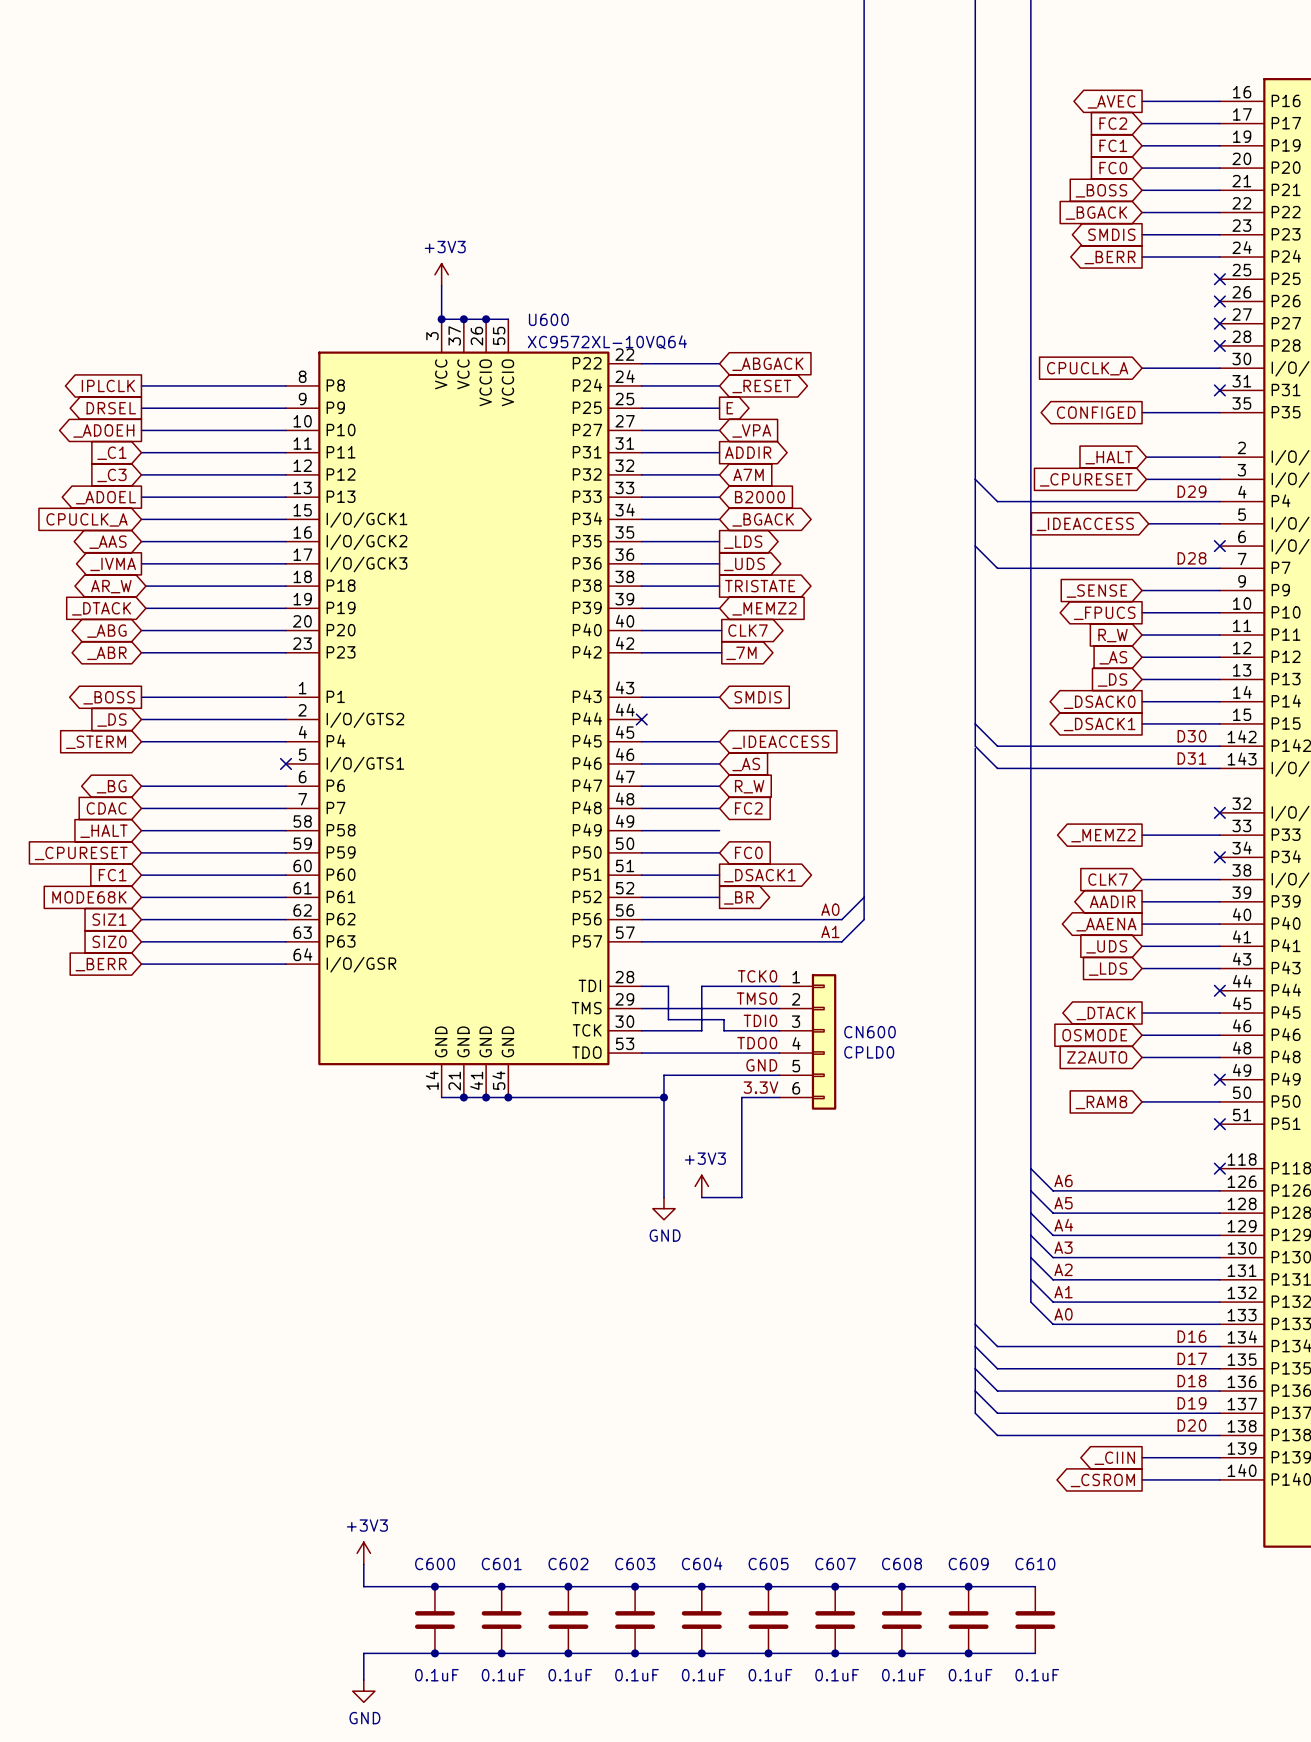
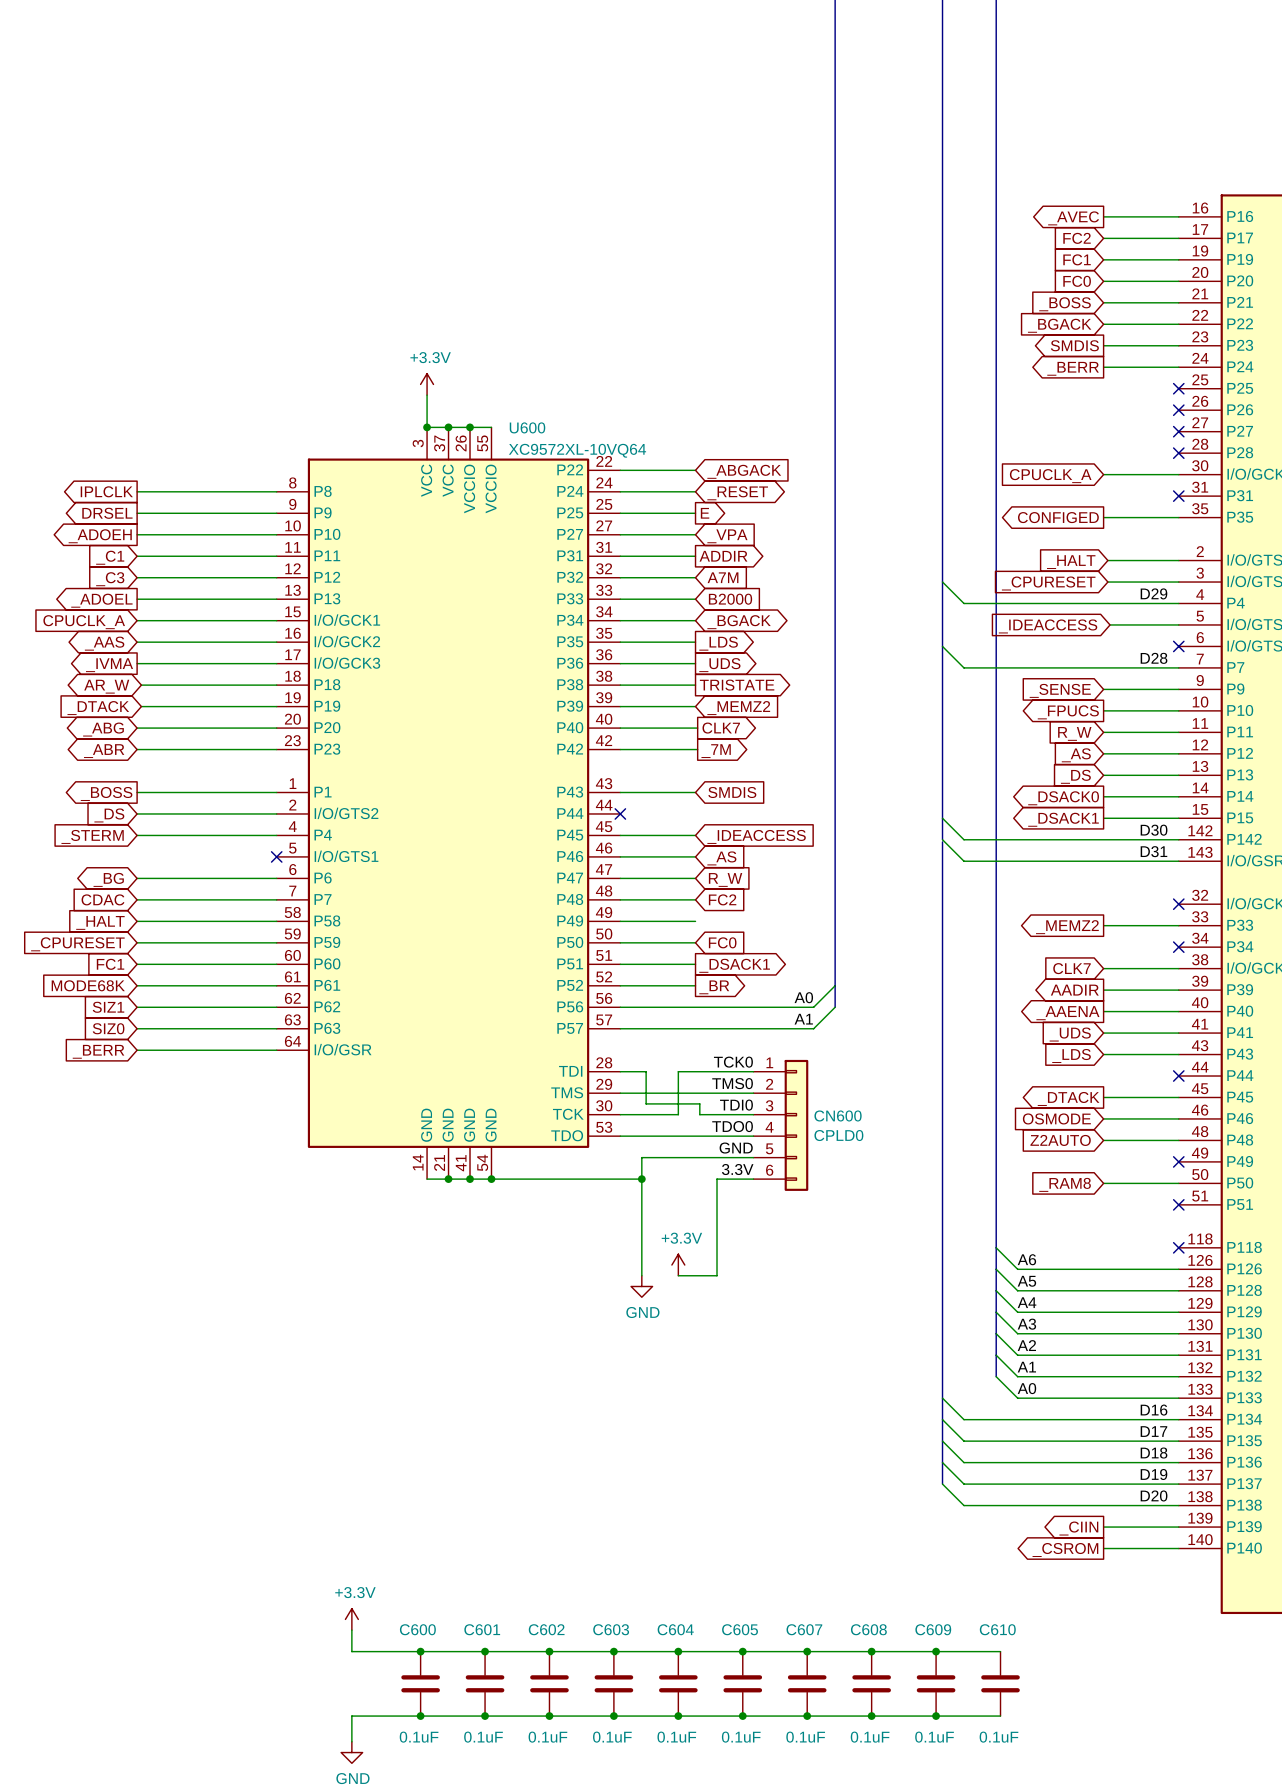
power symbol: +3V3 (441, 274) -> +3.3V (427, 384)
power symbol: +3V3 (701, 1186) -> +3.3V (678, 1265)
power symbol: +3V3 (363, 1553) -> +3.3V (351, 1619)

